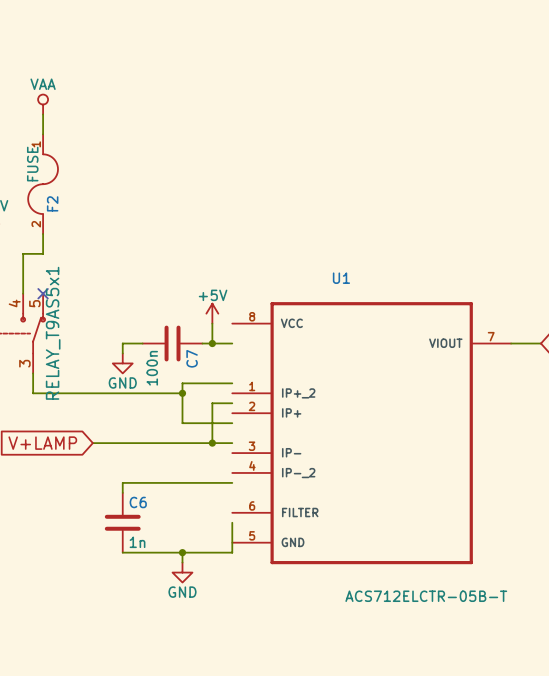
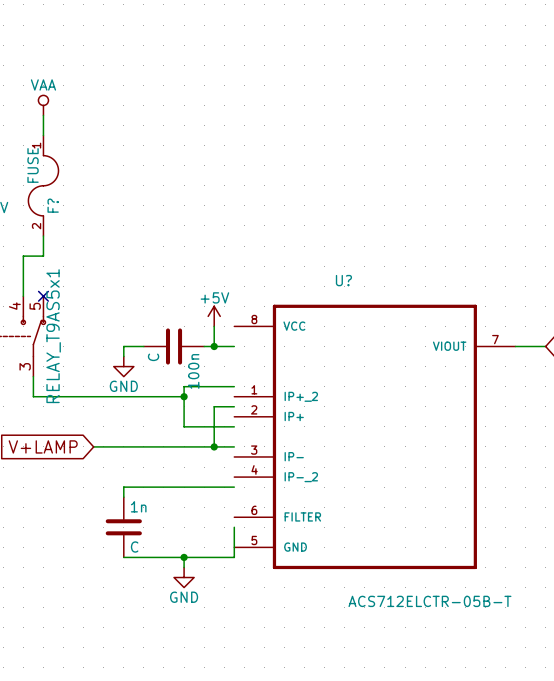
F2 name: F2 (52, 203) -> F? (53, 205)
U1 name: U1 (341, 278) -> U? (343, 280)
C7 name: C7 (192, 358) -> 100n (193, 371)
C7 value: 100n (152, 368) -> C (153, 357)
C6 name: C6 (138, 502) -> 1n (138, 506)
C6 value: 1n (137, 542) -> C (134, 547)

